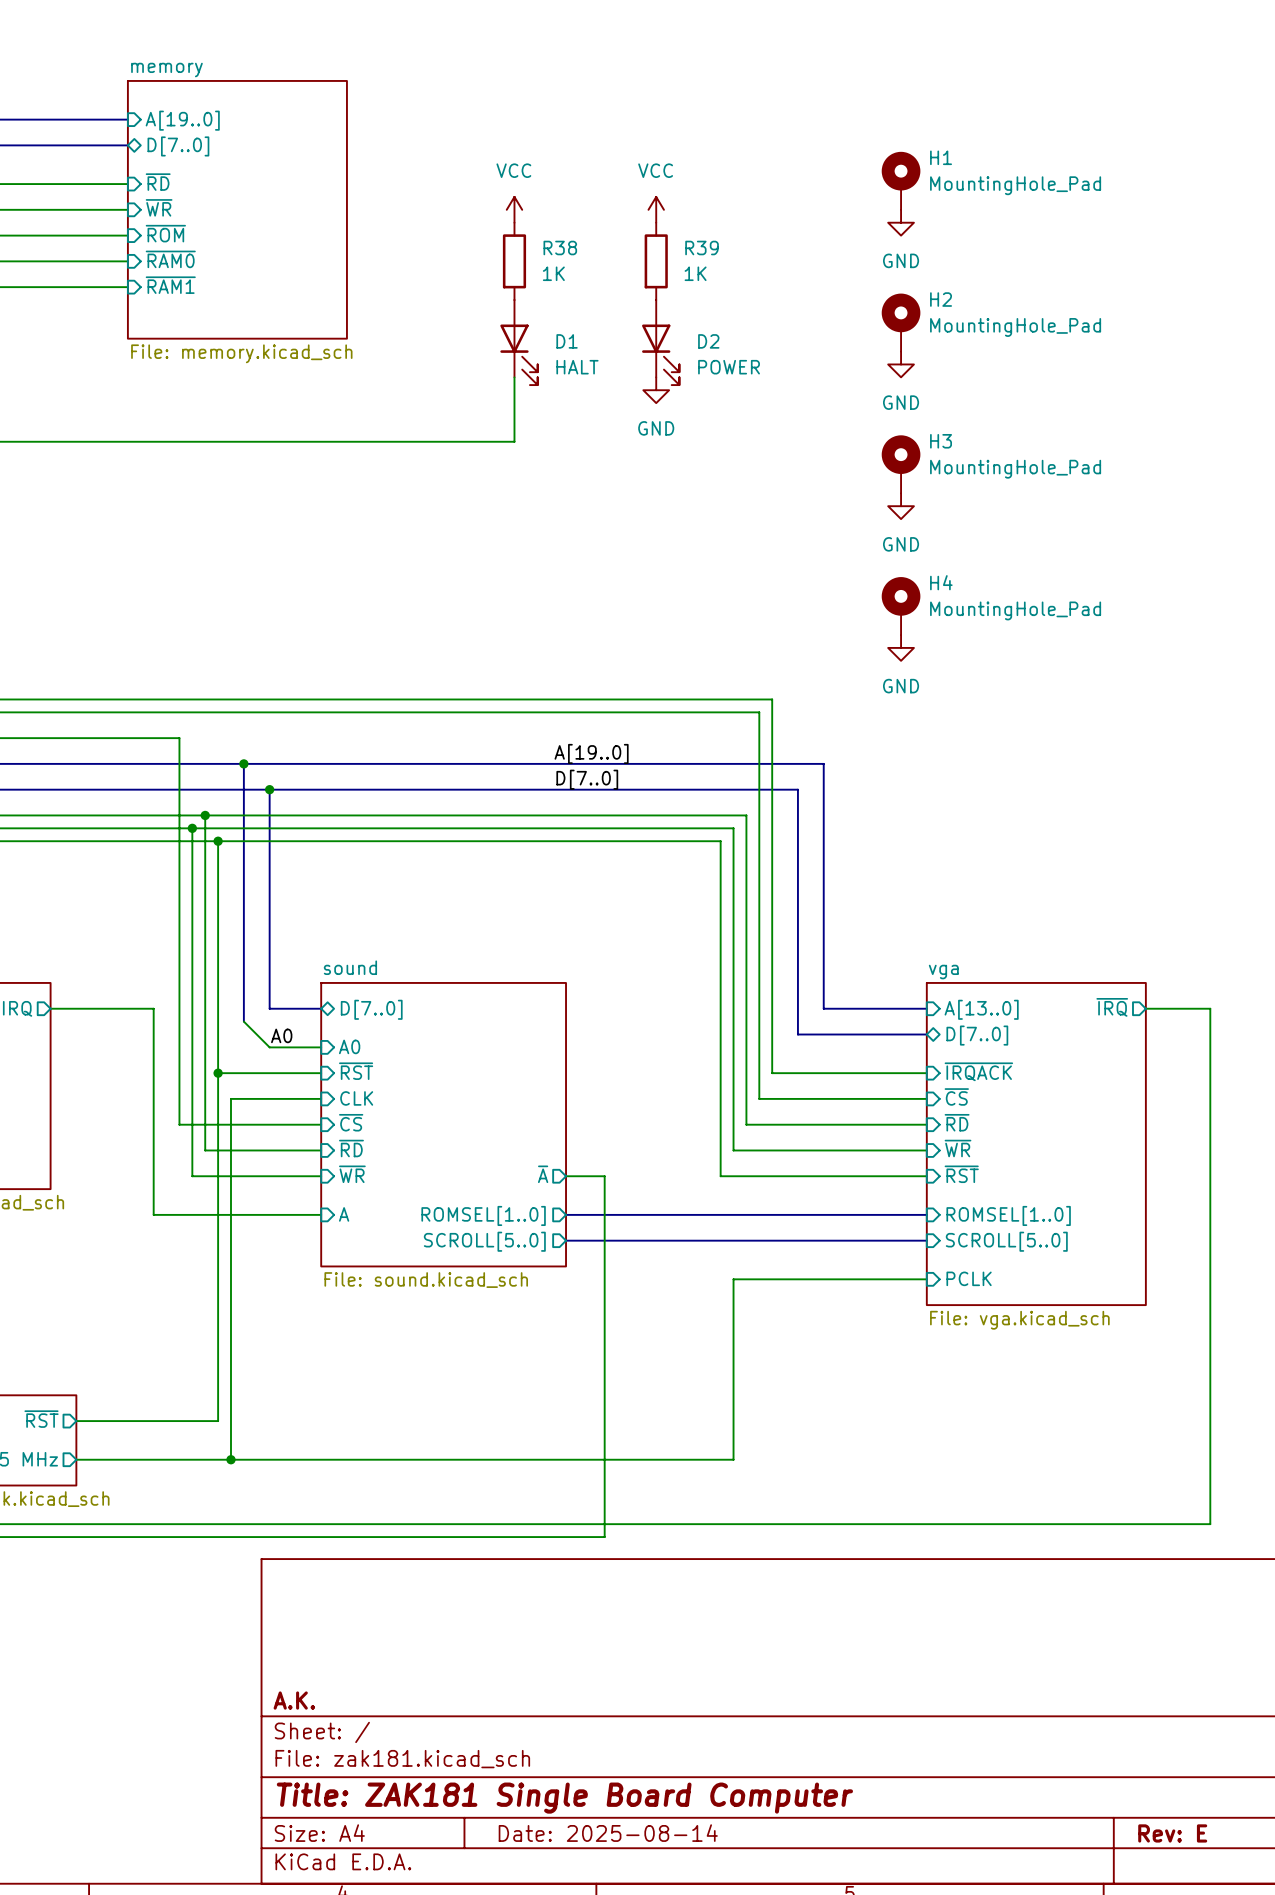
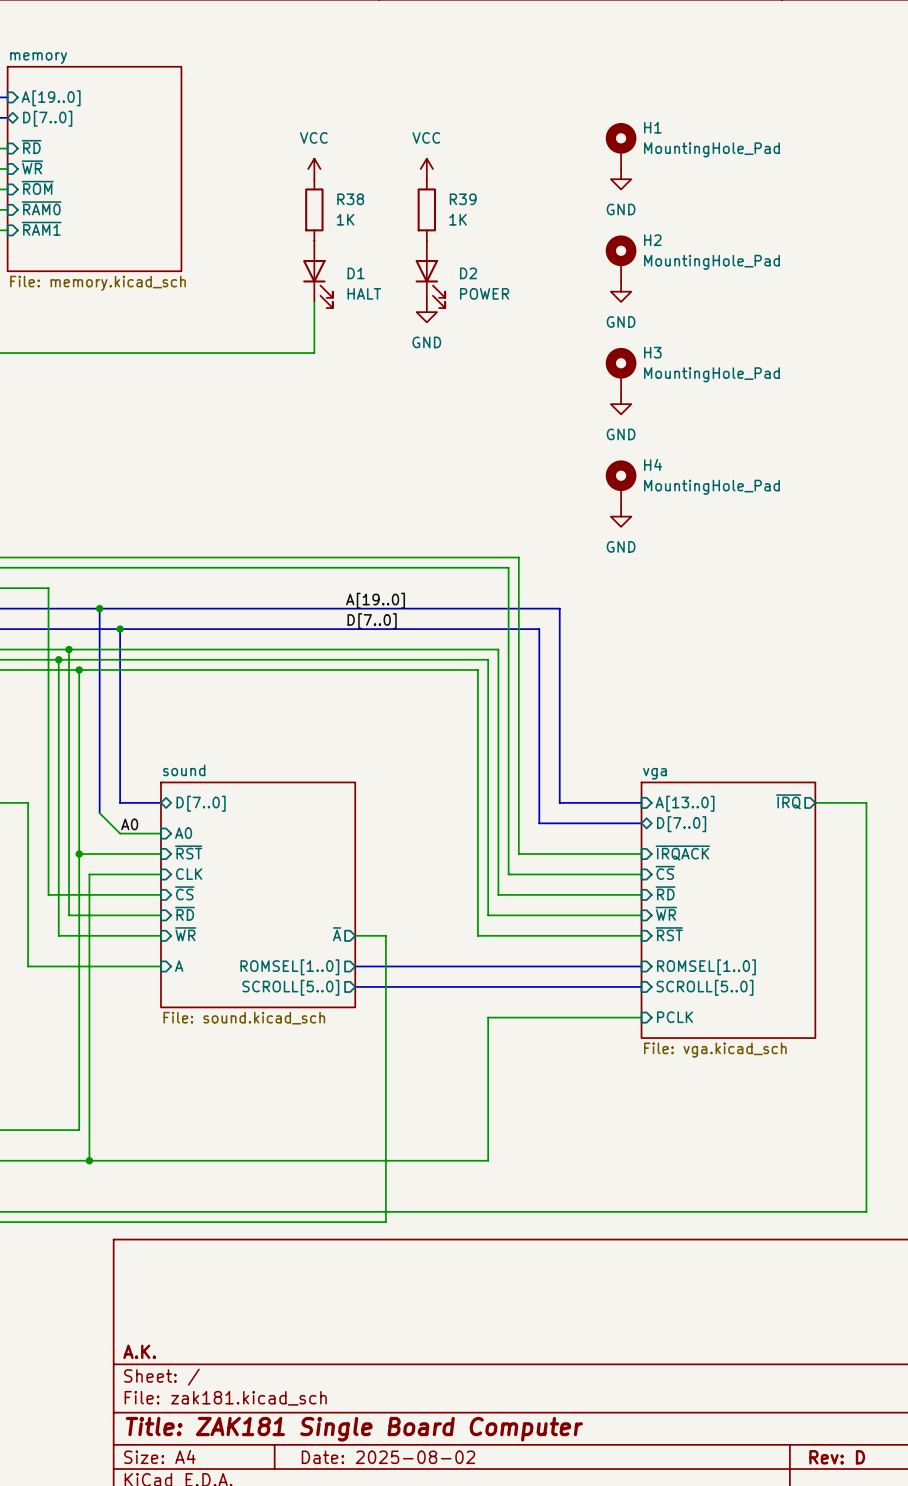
title block: Date: 2025-08-14 (608, 1833) -> Date: 2025-08-02 (388, 1457)
title block: Rev: E (1172, 1833) -> Rev: D (837, 1457)

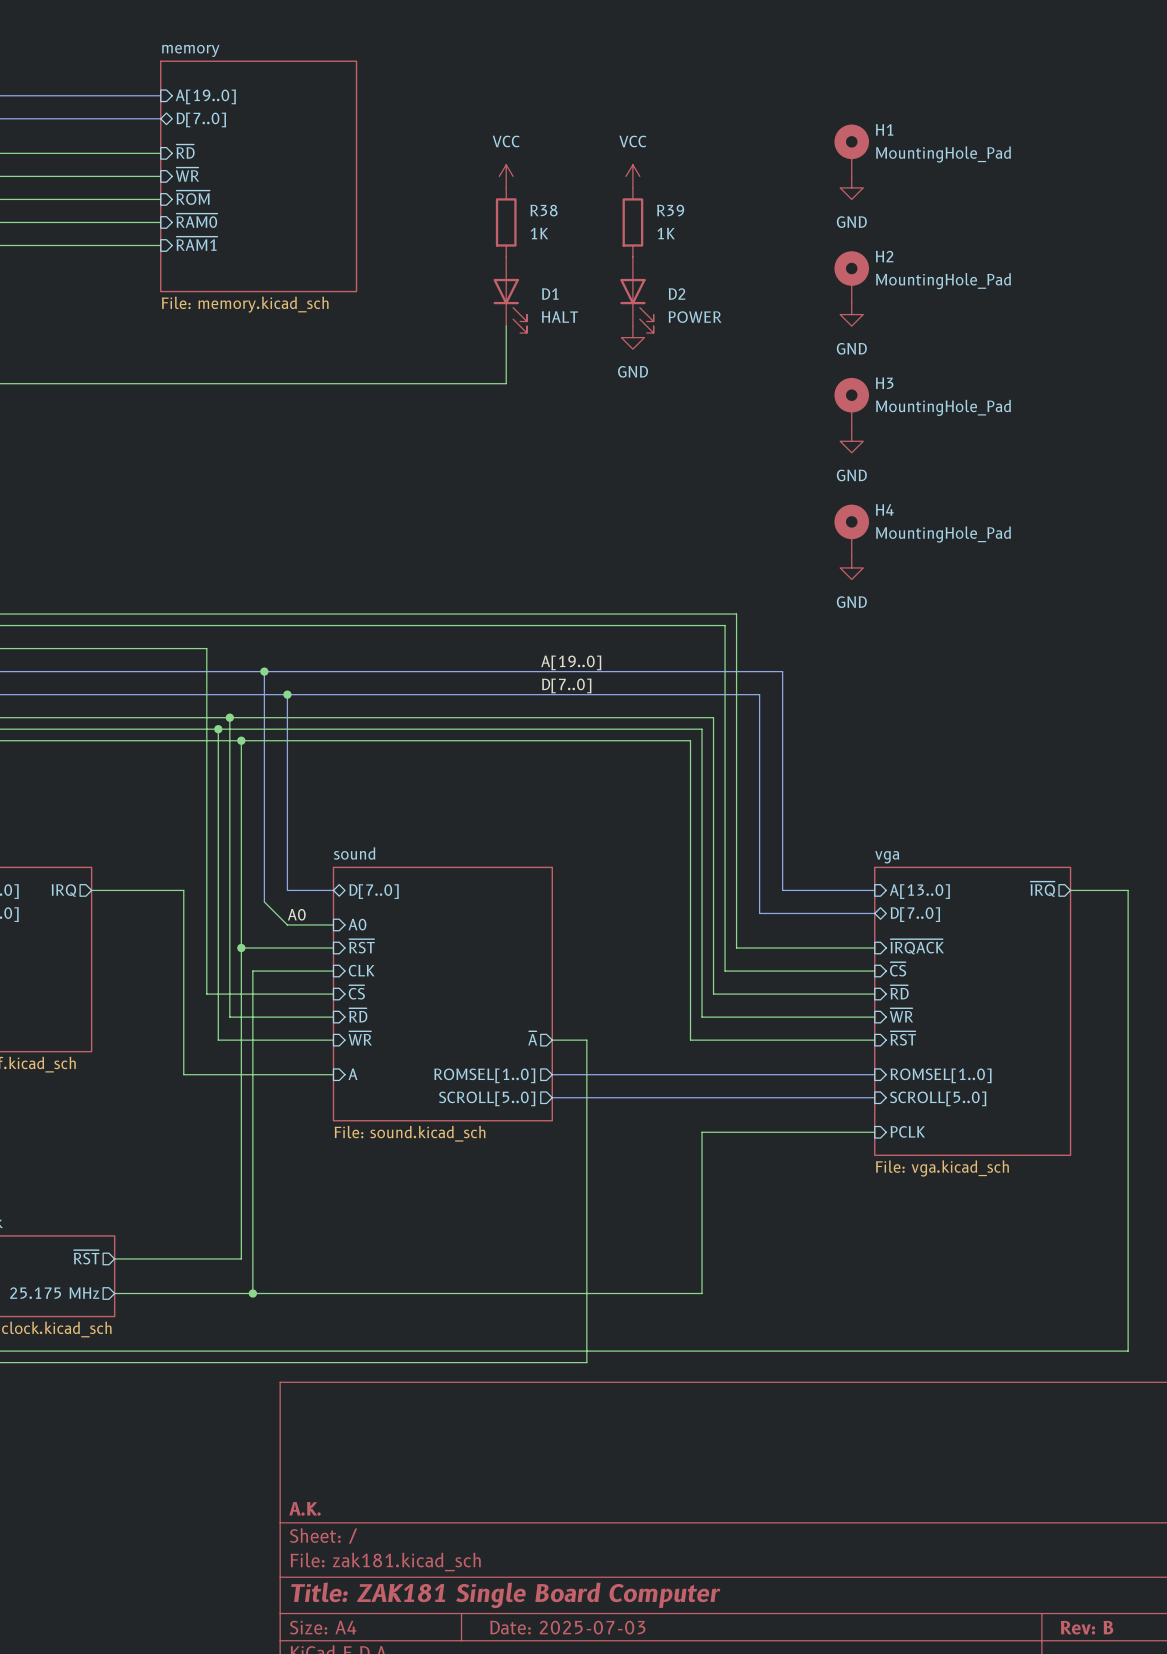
title block: Date: 2025-08-02 (388, 1457) -> Date: 2025-07-03 (567, 1627)
title block: Rev: D (837, 1457) -> Rev: B (1087, 1627)

